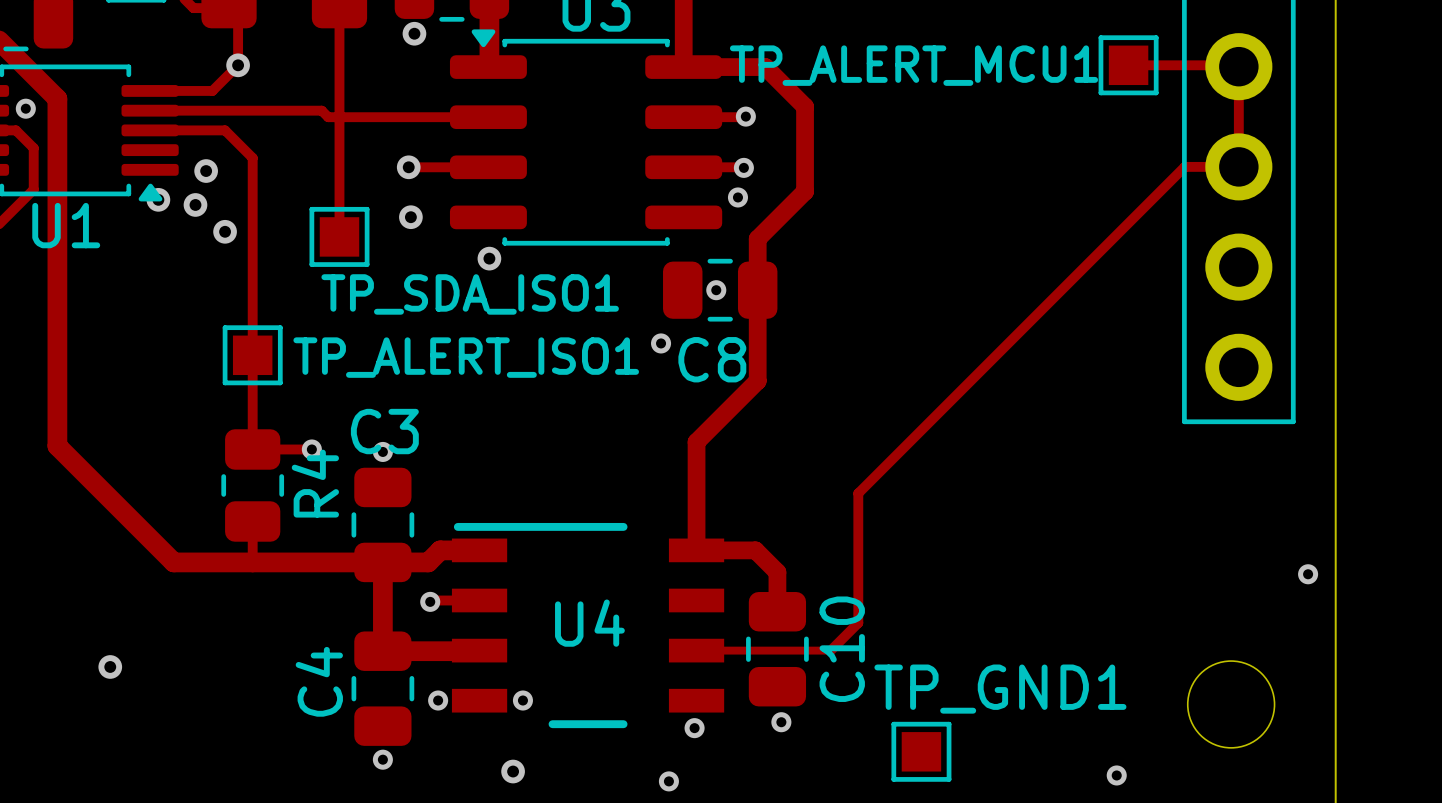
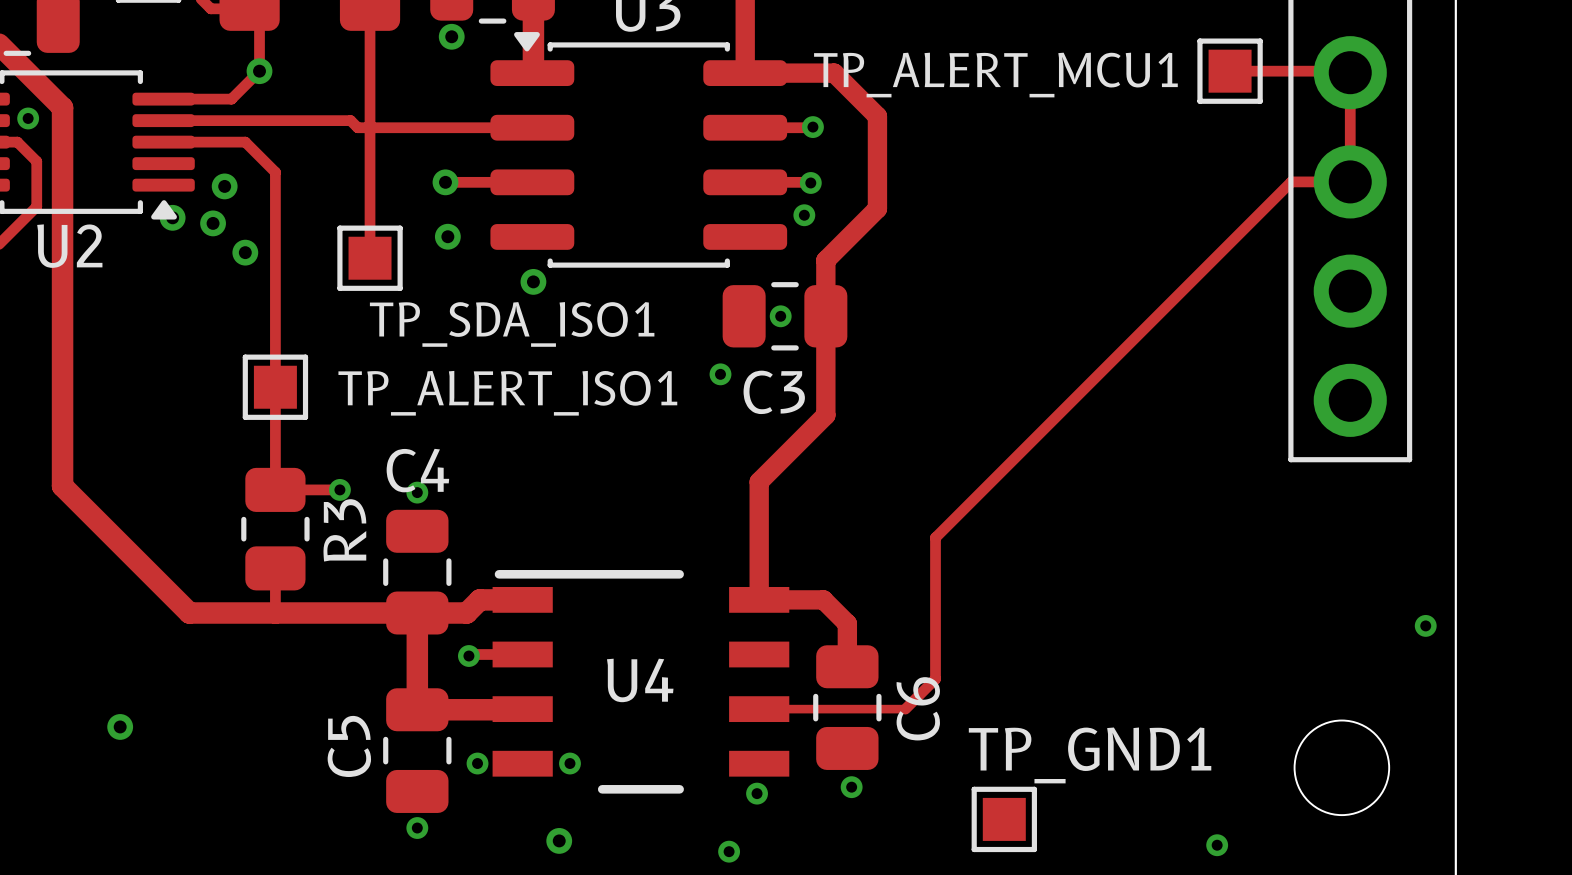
U1 name: U1 (66, 225) -> U2 (69, 246)
C8 name: C8 (712, 359) -> C3 (774, 392)
C3 name: C3 (384, 431) -> C4 (417, 470)
R4 name: R4 (315, 483) -> R3 (344, 530)
C10 name: C10 (842, 649) -> C6 (918, 708)
C4 name: C4 (319, 681) -> C5 (349, 746)

